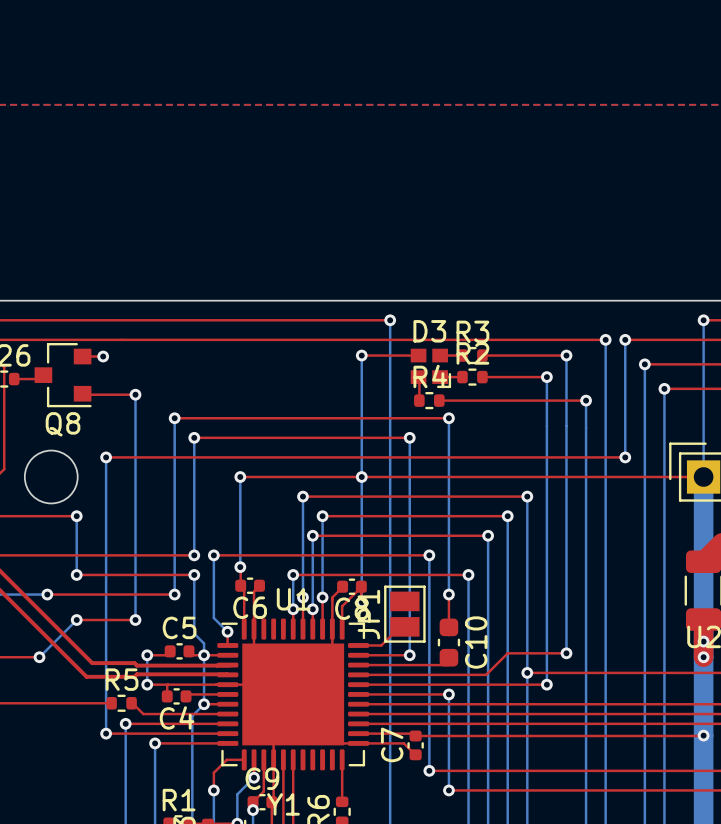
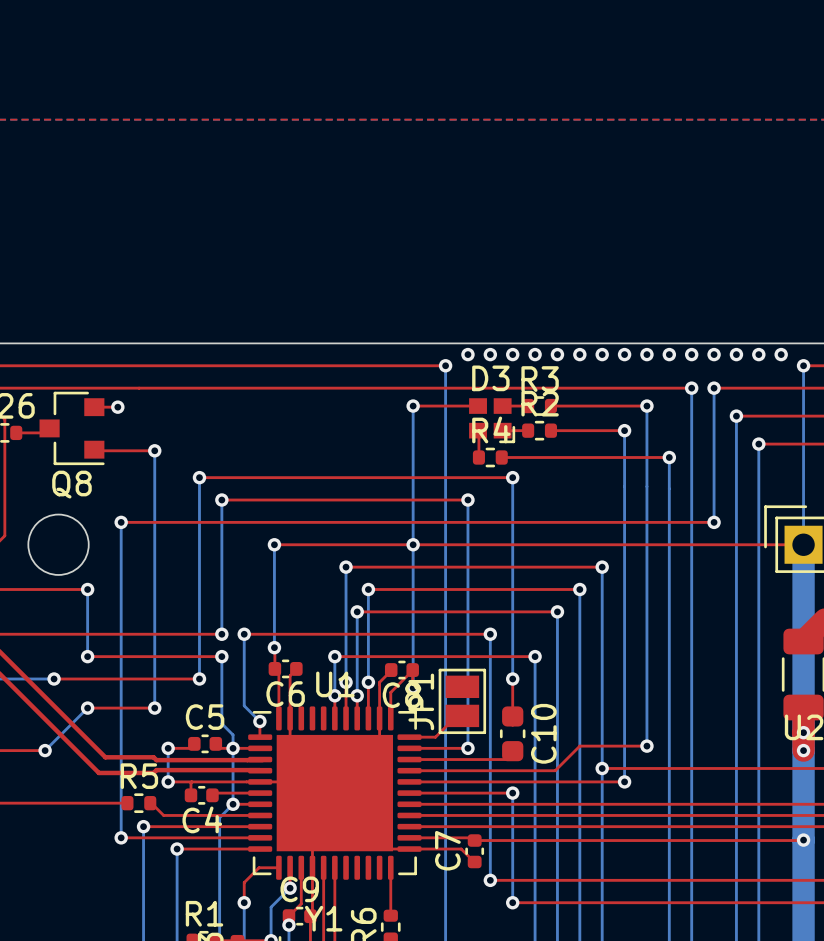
via: none -> (467, 354)
via: none -> (490, 354)
via: none -> (512, 354)
via: none -> (535, 354)
via: none -> (557, 354)
via: none -> (579, 354)
via: none -> (602, 354)
via: none -> (624, 354)
via: none -> (646, 354)
via: none -> (669, 354)
via: none -> (691, 354)
via: none -> (714, 354)
via: none -> (736, 354)
via: none -> (758, 354)
via: none -> (781, 354)

